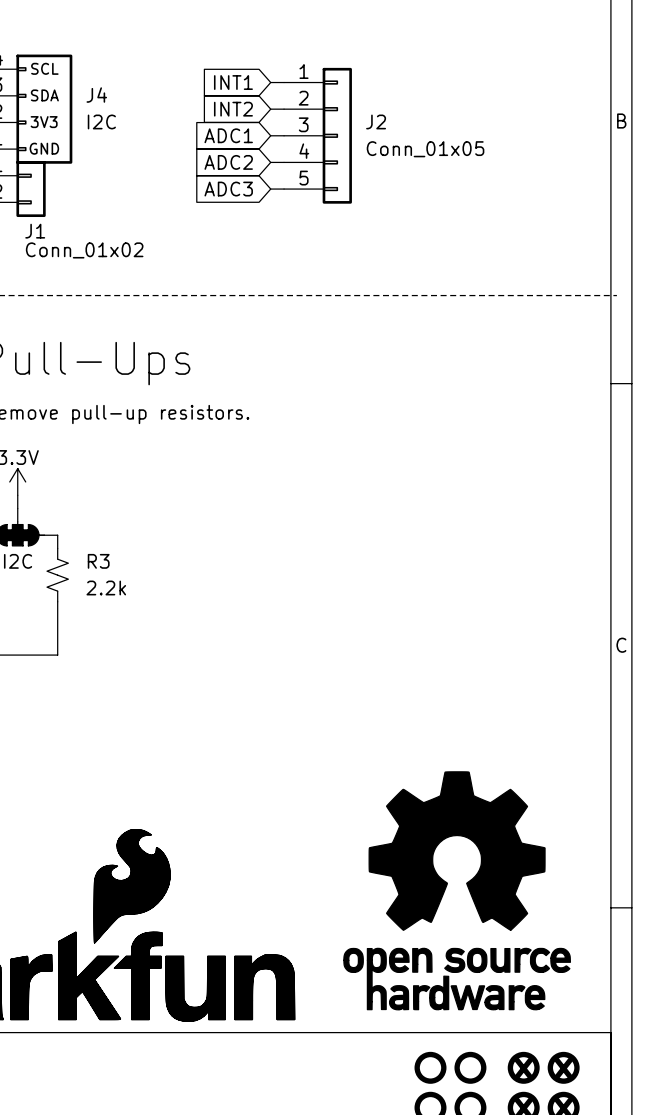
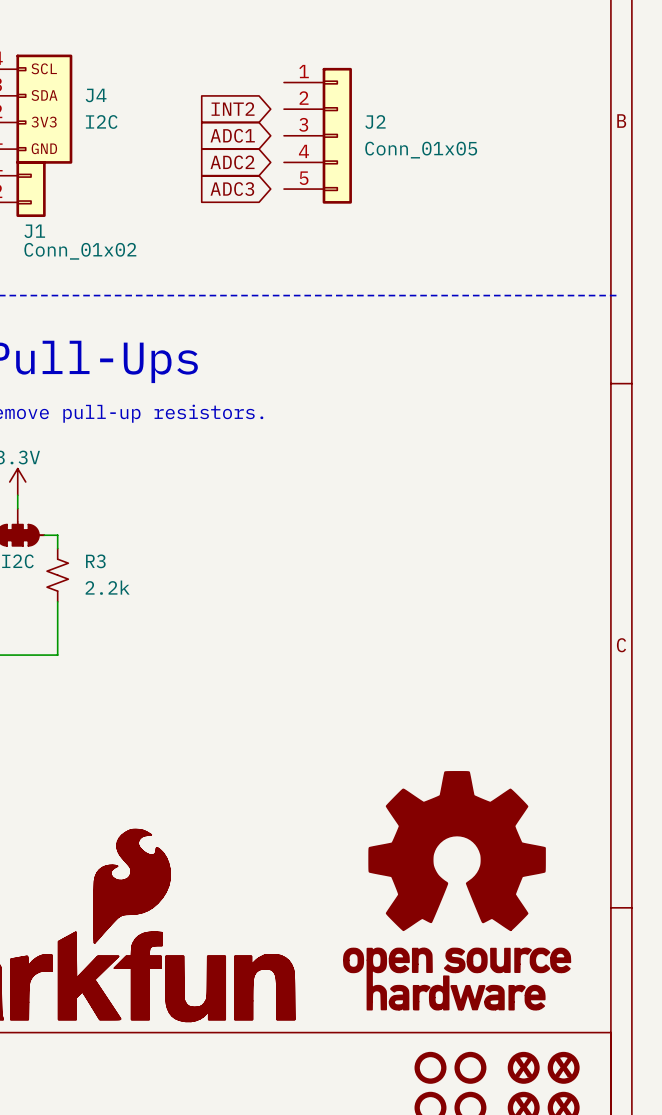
global label: INT1 (233, 82) -> none
wire: (270, 82) (284, 82) -> none
wire: (270, 109) (284, 109) -> none
wire: (270, 135) (284, 135) -> none
wire: (270, 162) (284, 162) -> none
wire: (270, 189) (284, 189) -> none

